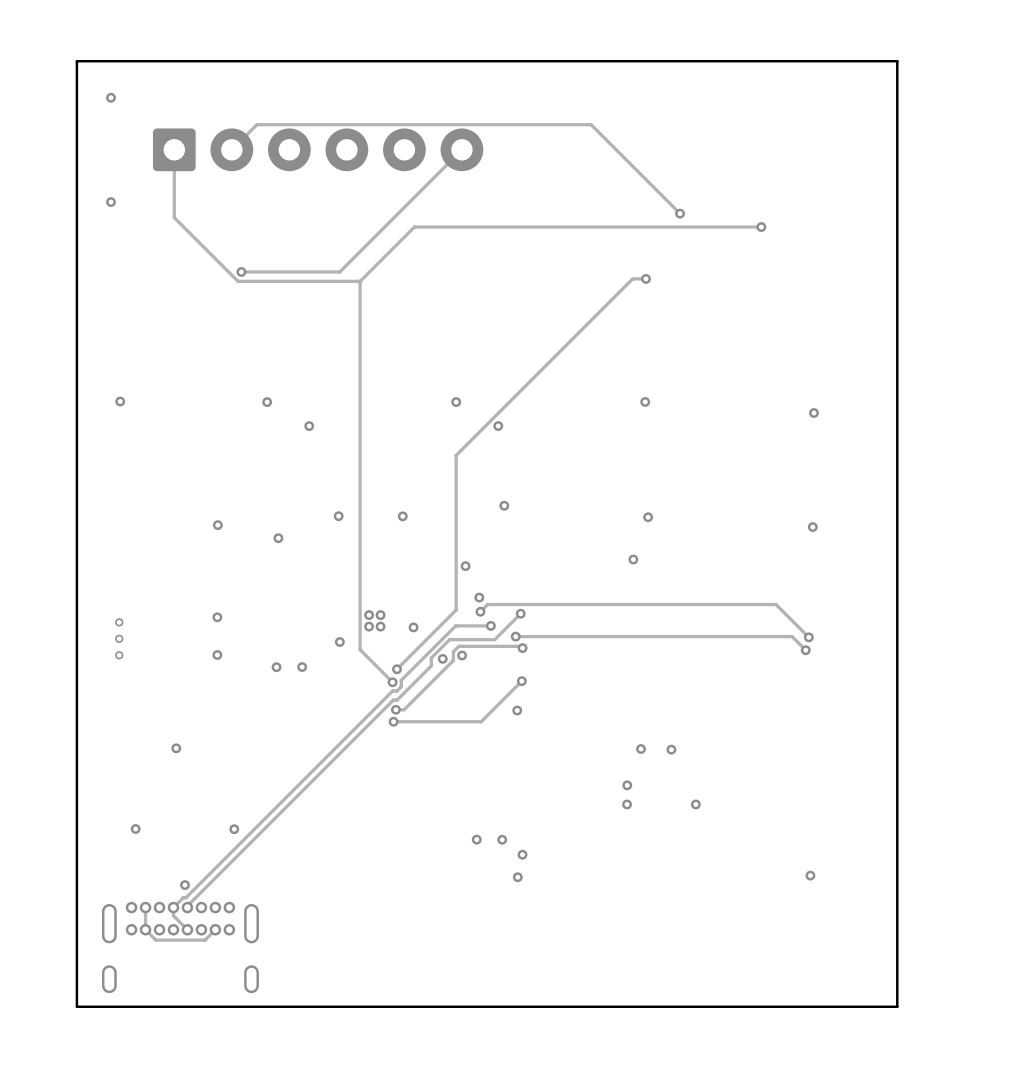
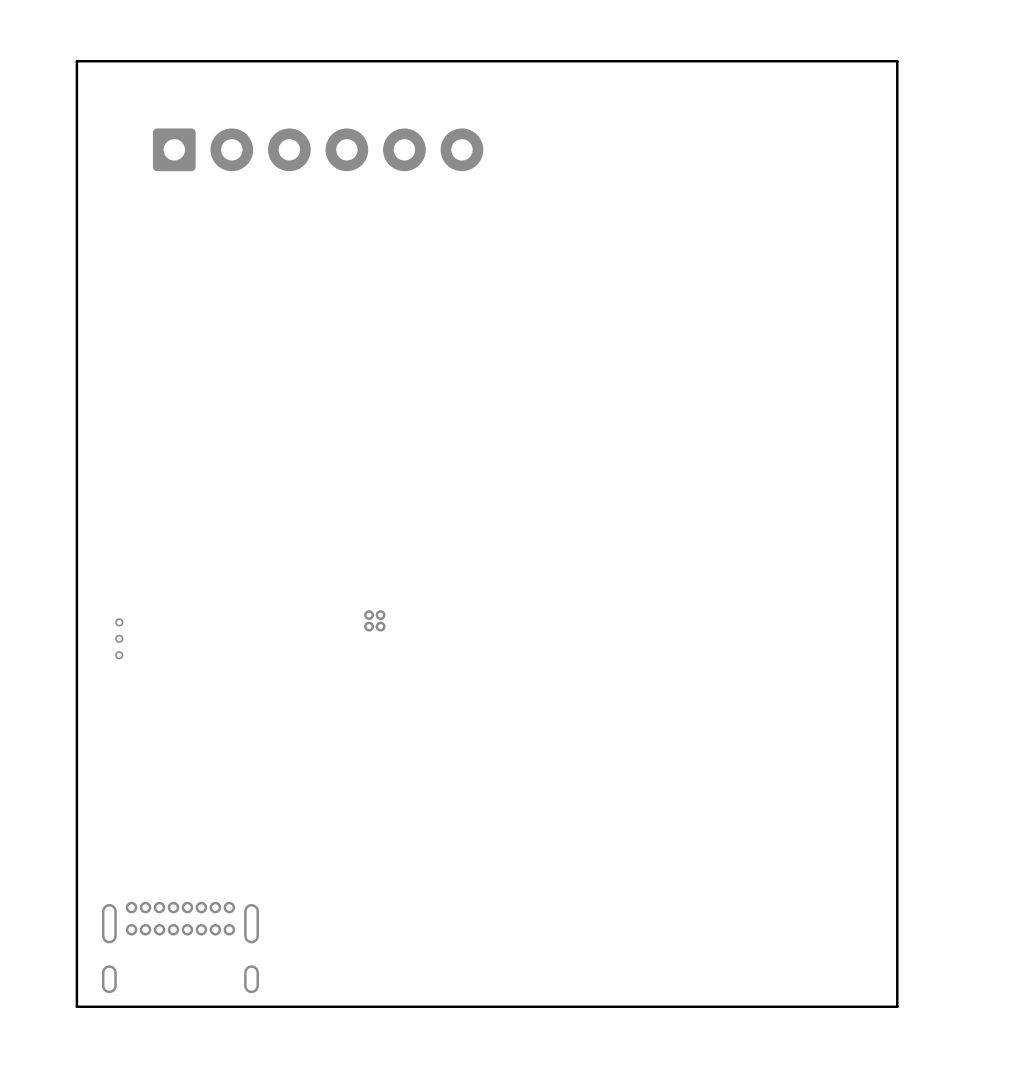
via: (111, 97) -> none
track: (174, 149) (174, 217) (238, 281) (360, 281) -> none
track: (231, 149) (256, 124) (591, 124) (680, 213) -> none
track: (461, 149) (339, 271) (241, 271) -> none
via: (111, 202) -> none
via: (680, 213) -> none
track: (761, 227) (414, 227) (360, 281) -> none
via: (761, 227) -> none
via: (241, 271) -> none
track: (646, 278) (632, 278) (456, 455) (456, 610) (396, 669) -> none
via: (646, 278) -> none
track: (360, 281) (360, 649) (392, 682) -> none
via: (120, 401) -> none
via: (645, 401) -> none
via: (267, 402) -> none
via: (456, 402) -> none
via: (813, 413) -> none
via: (309, 426) -> none
via: (498, 426) -> none
via: (504, 505) -> none
via: (338, 516) -> none
via: (402, 516) -> none
via: (648, 517) -> none
via: (217, 525) -> none
via: (812, 527) -> none
via: (278, 538) -> none
via: (633, 559) -> none
via: (465, 566) -> none
via: (479, 597) -> none
track: (480, 611) (487, 604) (776, 604) (808, 637) -> none
via: (480, 611) -> none
track: (520, 613) (494, 639) (449, 639) (431, 657) (431, 665) (397, 700) (393, 700) (187, 907) -> none
via: (520, 613) -> none
via: (217, 617) -> none
track: (490, 625) (455, 625) (401, 680) (401, 686) (397, 690) (392, 690) (185, 897) (183, 897) (173, 907) (173, 915) (187, 929) -> none
via: (490, 625) -> none
via: (413, 627) -> none
track: (515, 636) (792, 636) (805, 650) -> none
via: (515, 636) -> none
via: (808, 637) -> none
via: (339, 642) -> none
track: (522, 648) (520, 646) (458, 646) (453, 651) (453, 660) (404, 709) (395, 709) -> none
via: (522, 648) -> none
via: (805, 650) -> none
via: (217, 655) -> none
via: (462, 655) -> none
via: (442, 658) -> none
via: (276, 667) -> none
via: (302, 667) -> none
via: (396, 669) -> none
track: (521, 681) (481, 721) (393, 721) -> none
via: (521, 681) -> none
via: (392, 682) -> none
via: (395, 709) -> none
via: (517, 710) -> none
via: (393, 721) -> none
via: (176, 748) -> none
via: (641, 749) -> none
via: (671, 749) -> none
via: (627, 785) -> none
via: (627, 804) -> none
via: (695, 804) -> none
via: (135, 828) -> none
via: (234, 829) -> none
via: (476, 839) -> none
via: (502, 839) -> none
via: (522, 854) -> none
via: (810, 875) -> none
via: (517, 877) -> none
via: (184, 885) -> none
track: (145, 907) (145, 929) (155, 940) (205, 940) (215, 929) -> none

